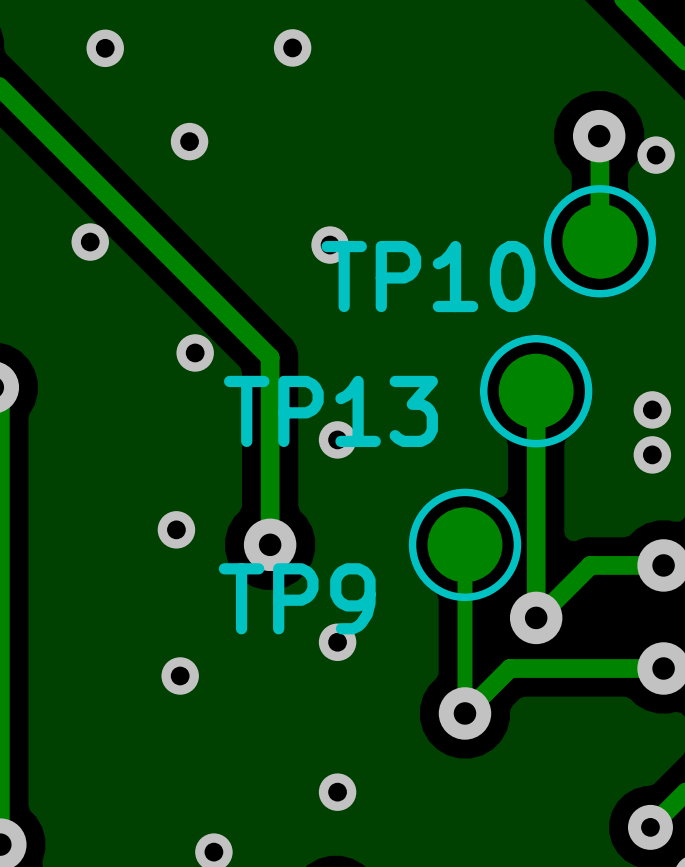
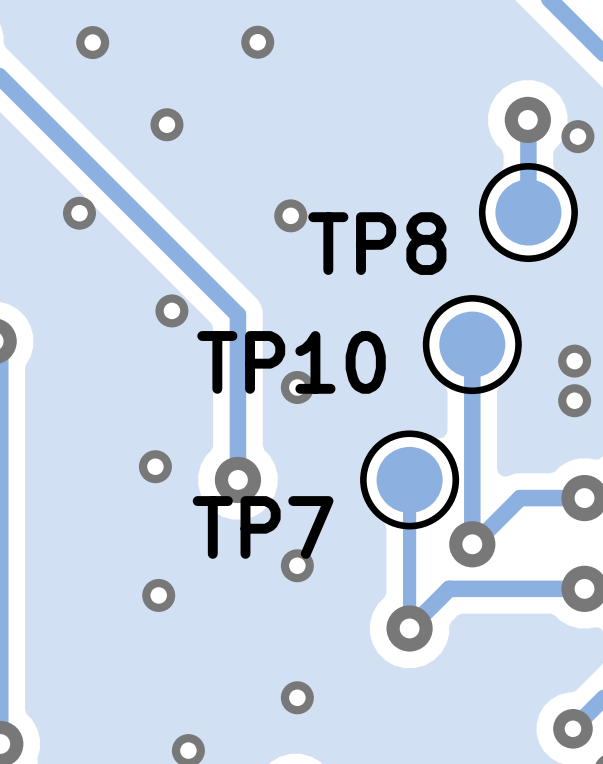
TP10 name: TP10 (428, 276) -> TP8 (377, 243)
TP13 name: TP13 (330, 411) -> TP10 (291, 362)
TP9 name: TP9 (297, 598) -> TP7 (263, 527)

